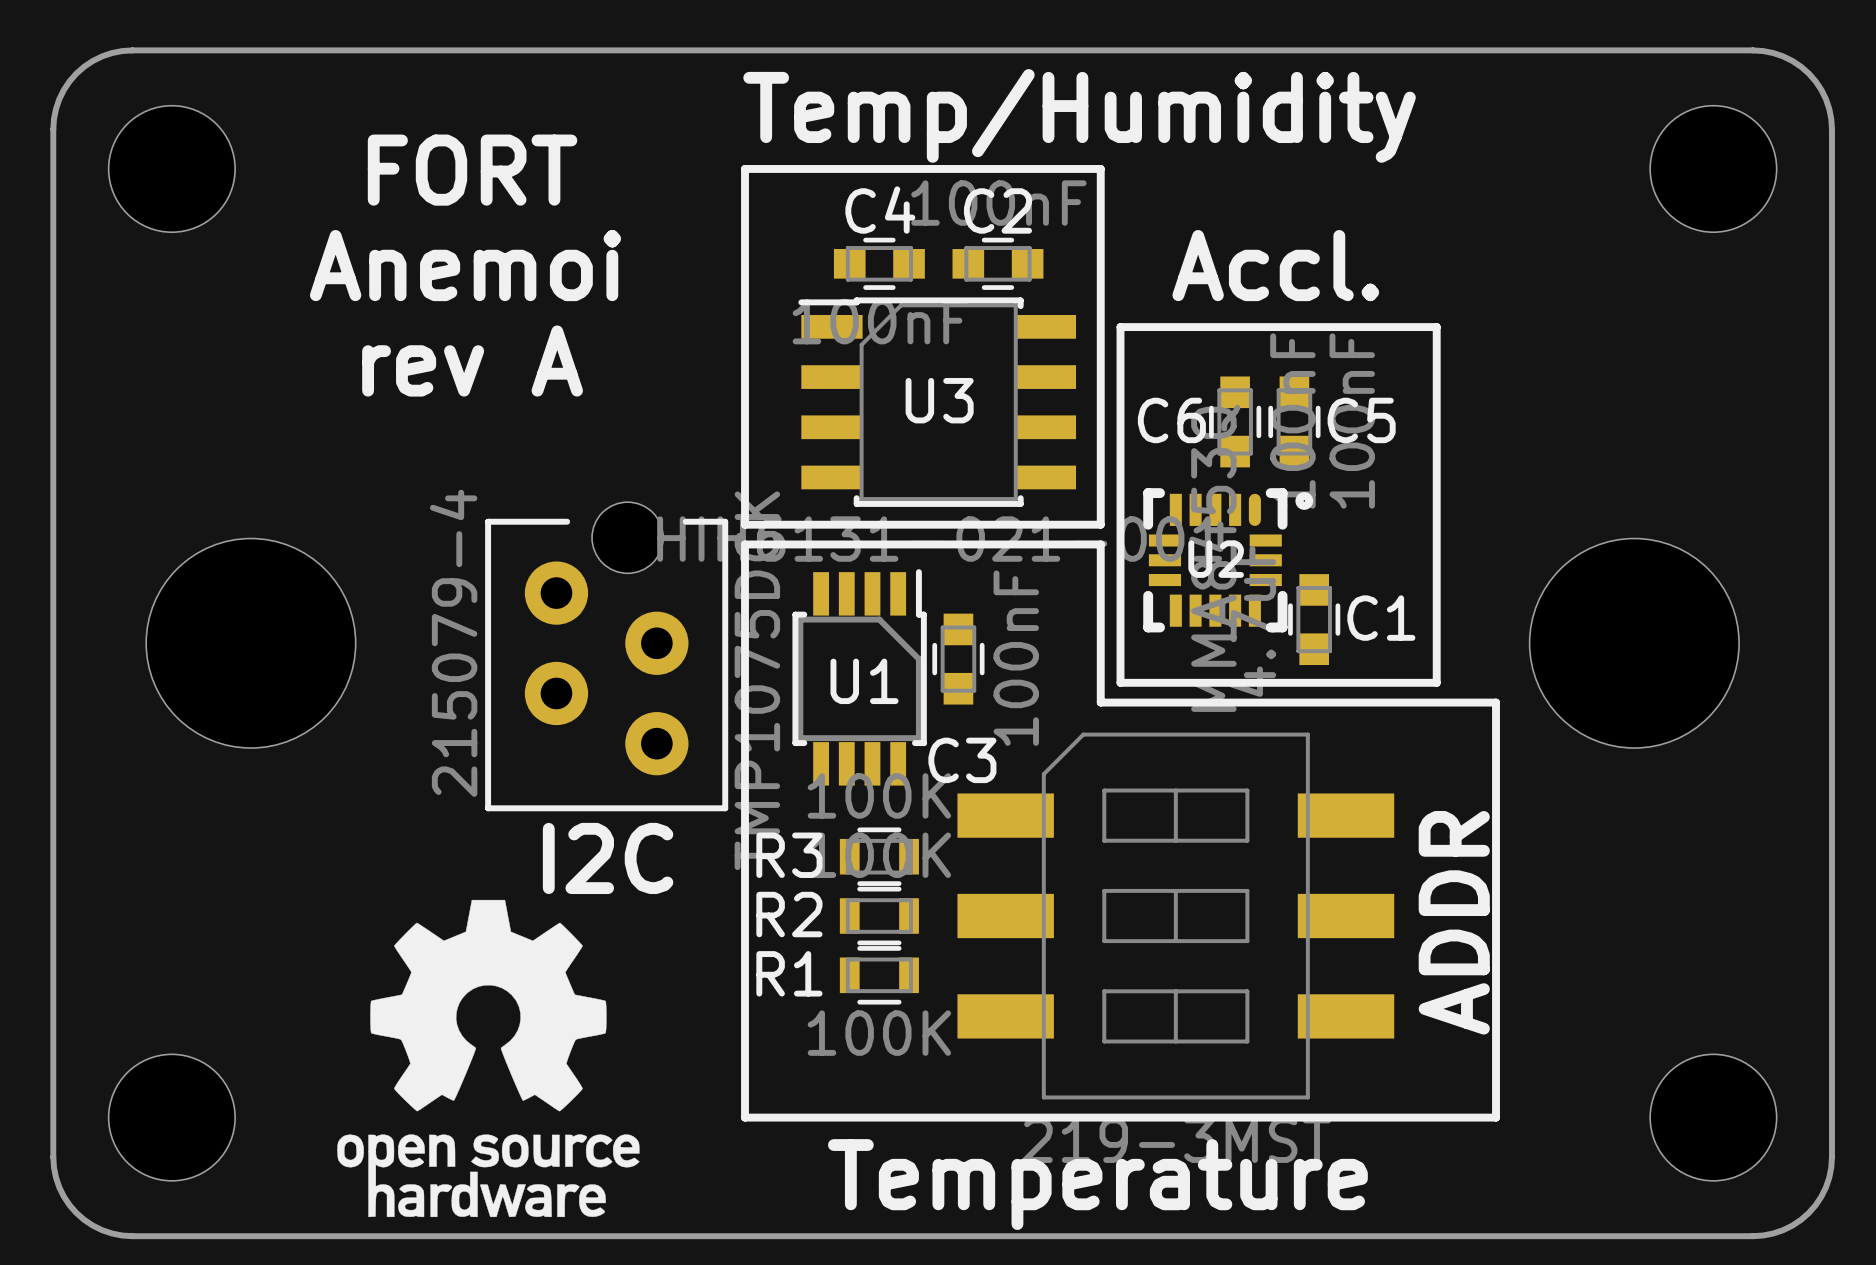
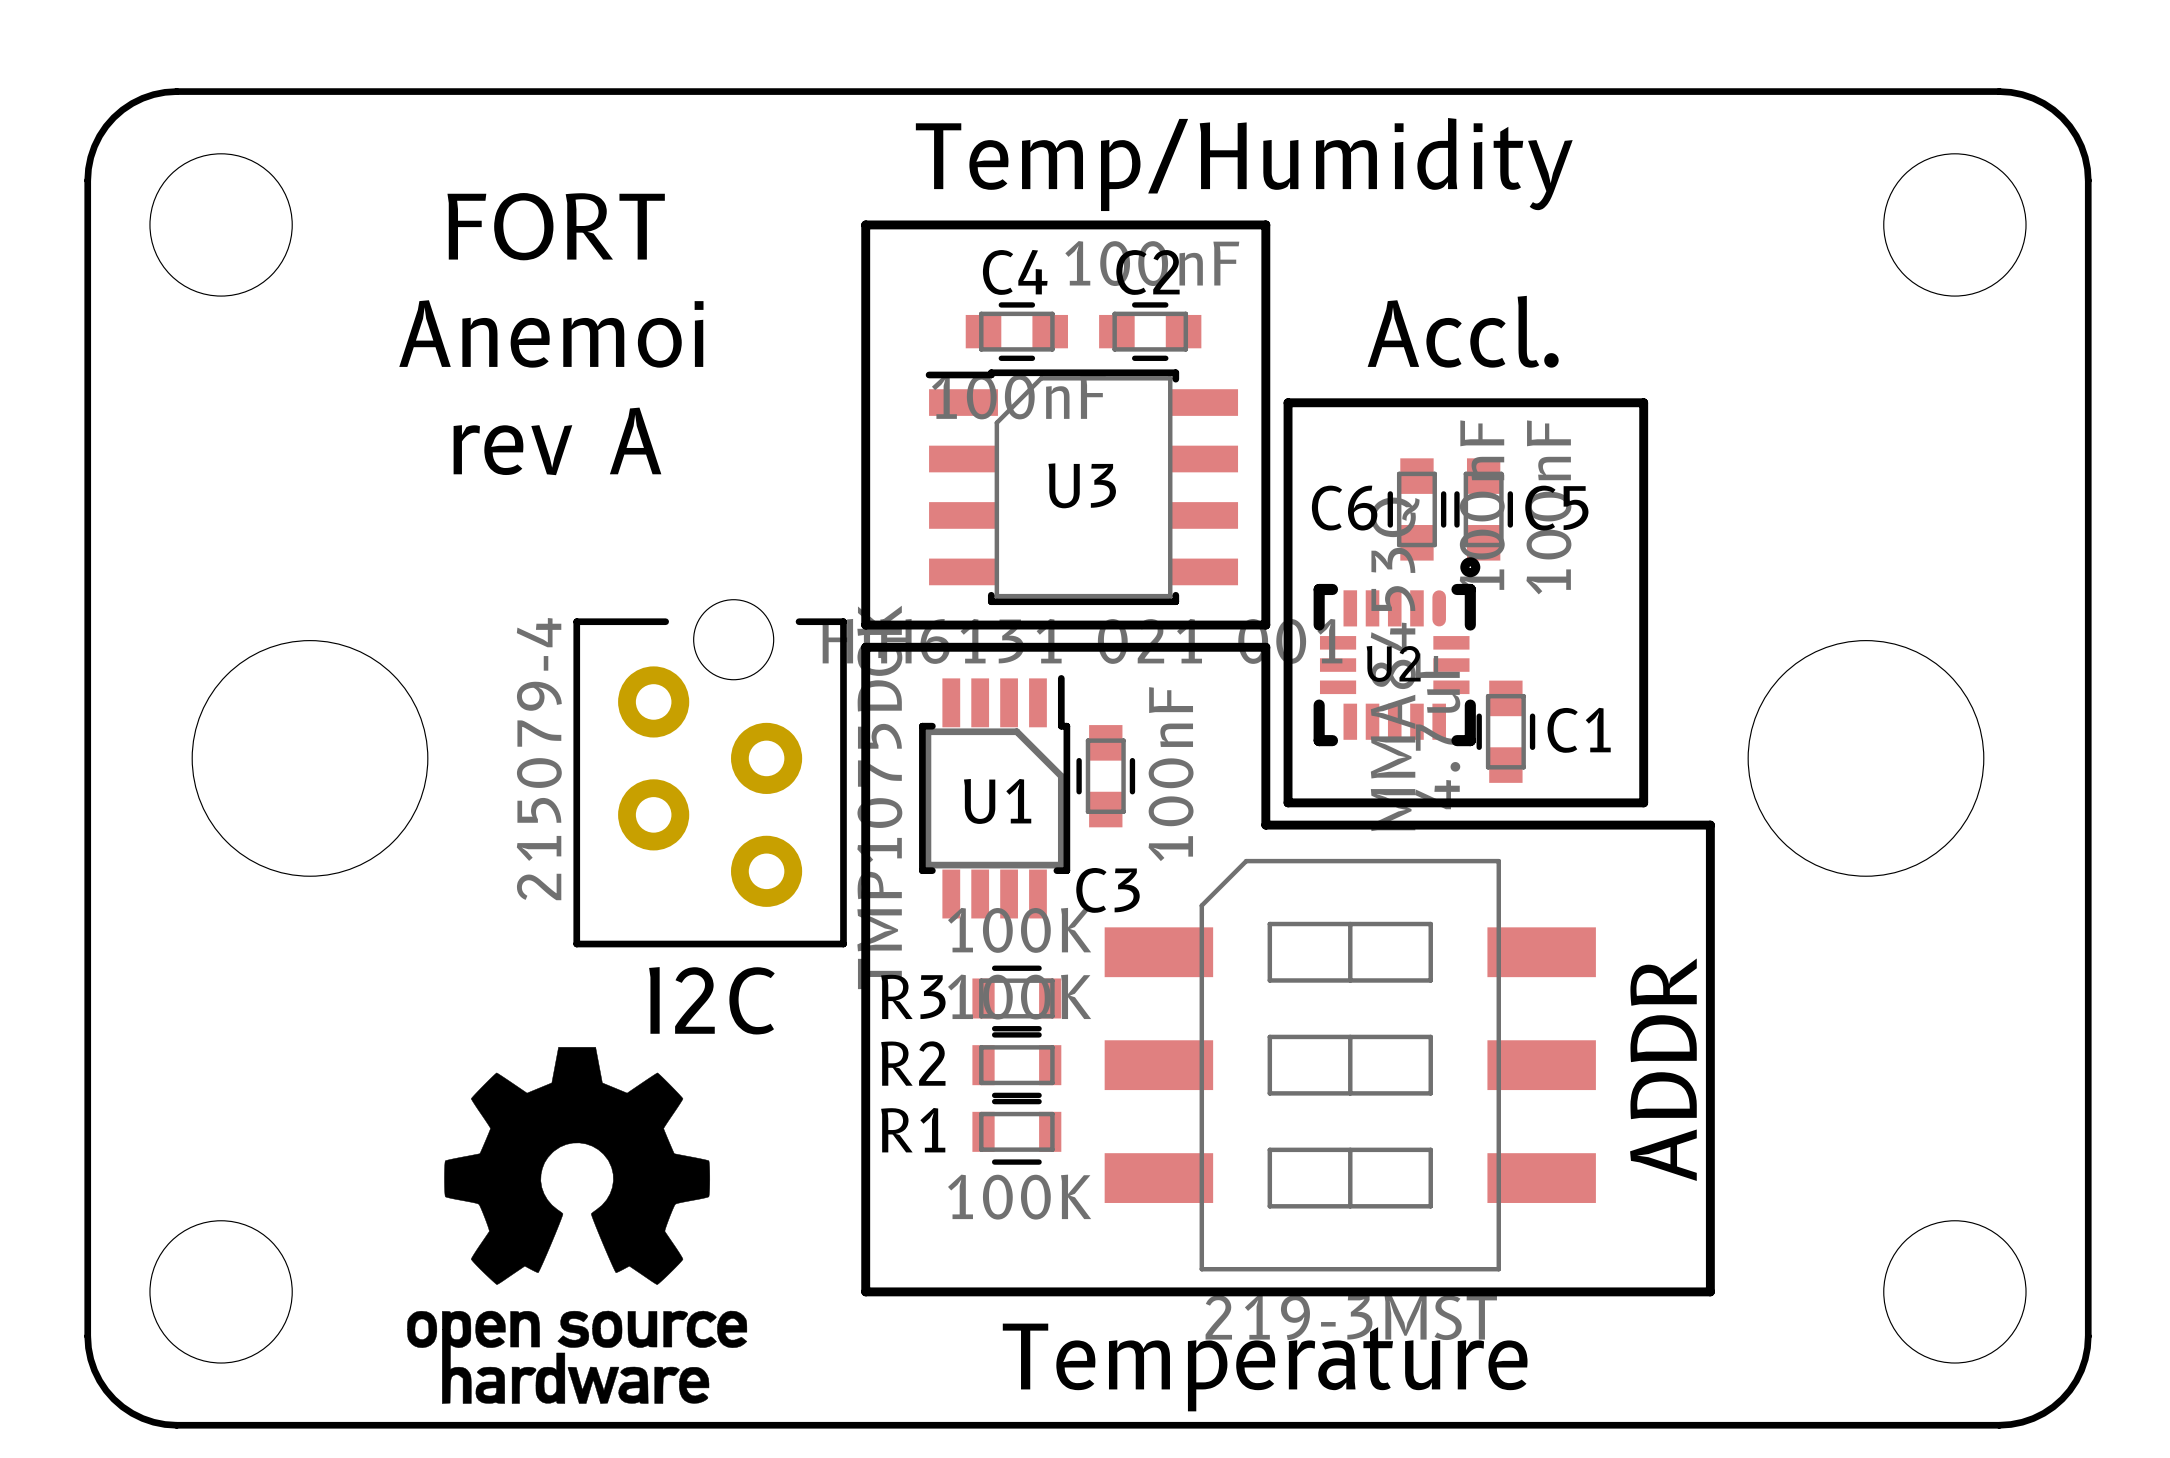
U2 footprint: [1143, 488, 1314, 633] -> [1313, 557, 1481, 747]

